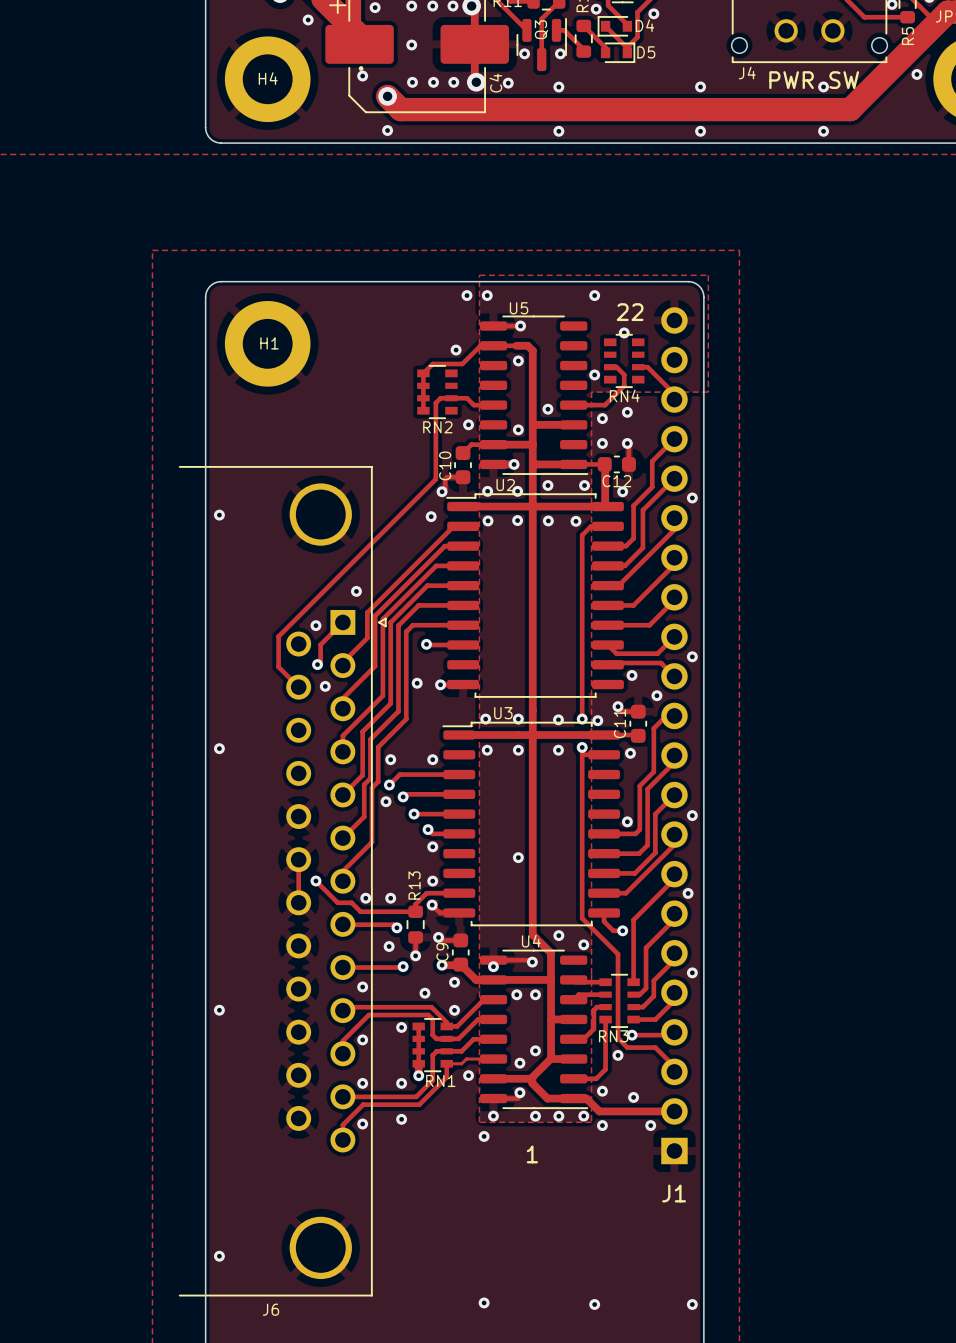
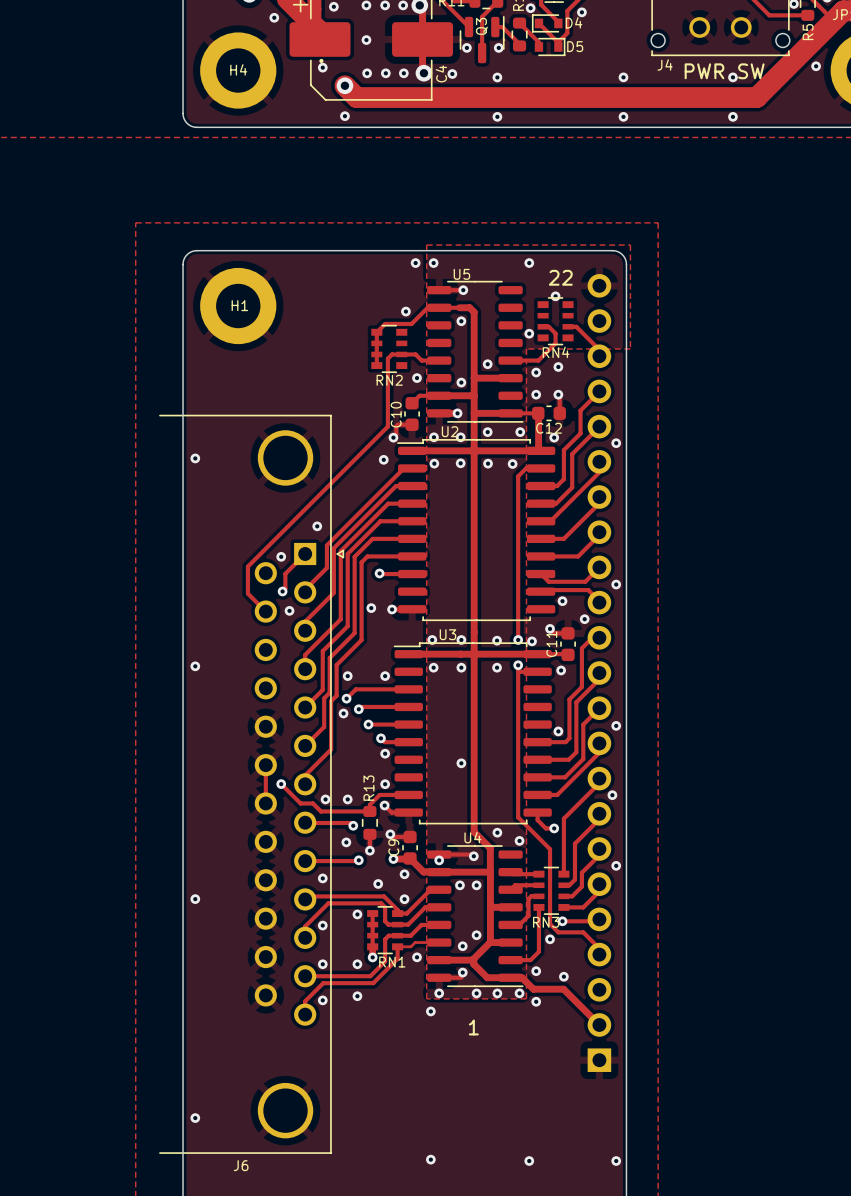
J1: (674, 735) -> none
part: none -> (599, 673)
track: (633, 1111) (674, 1111) -> (563, 989) (599, 1024)
via: (650, 1125) -> none

